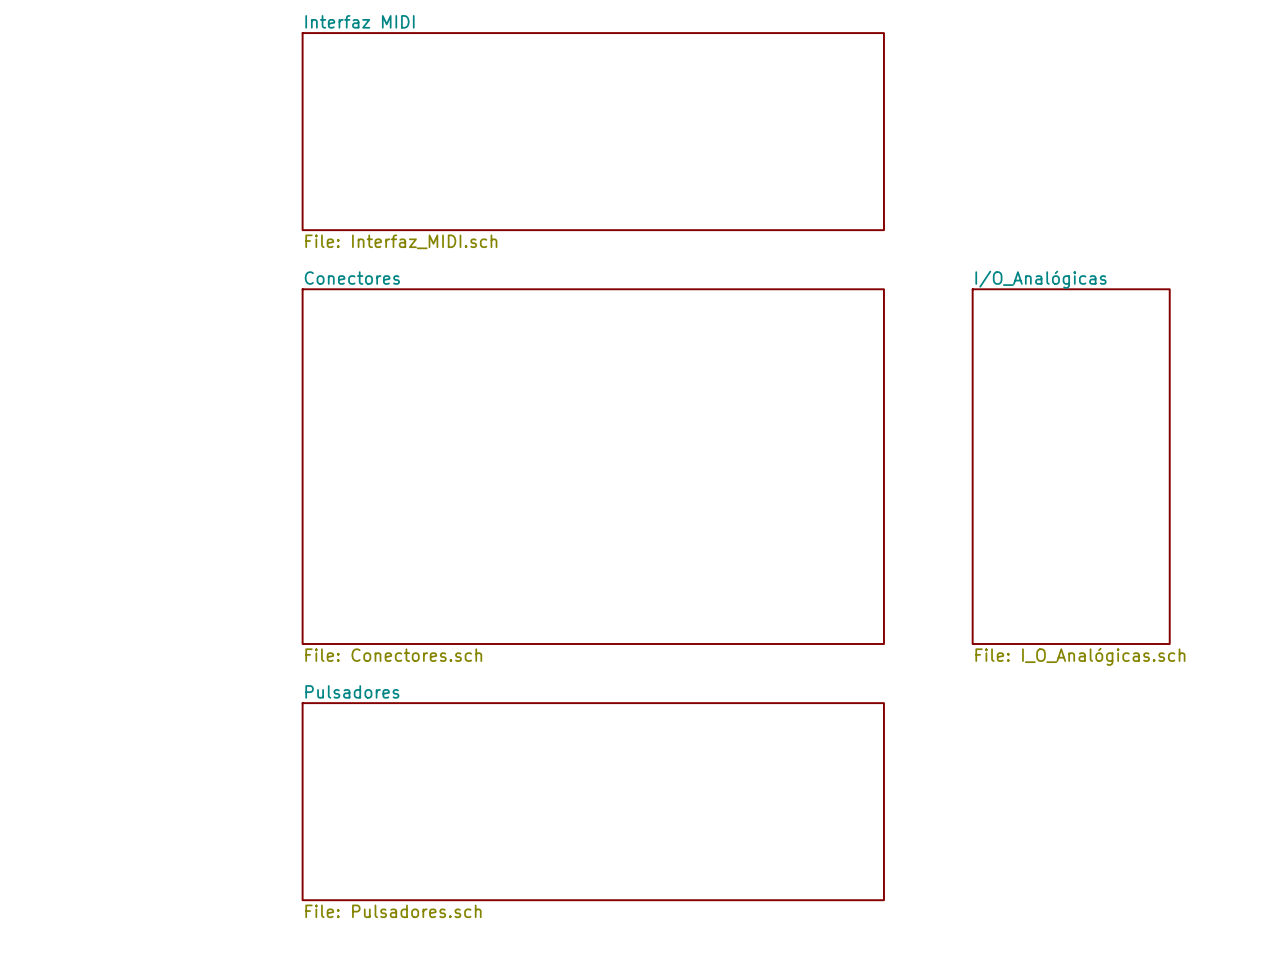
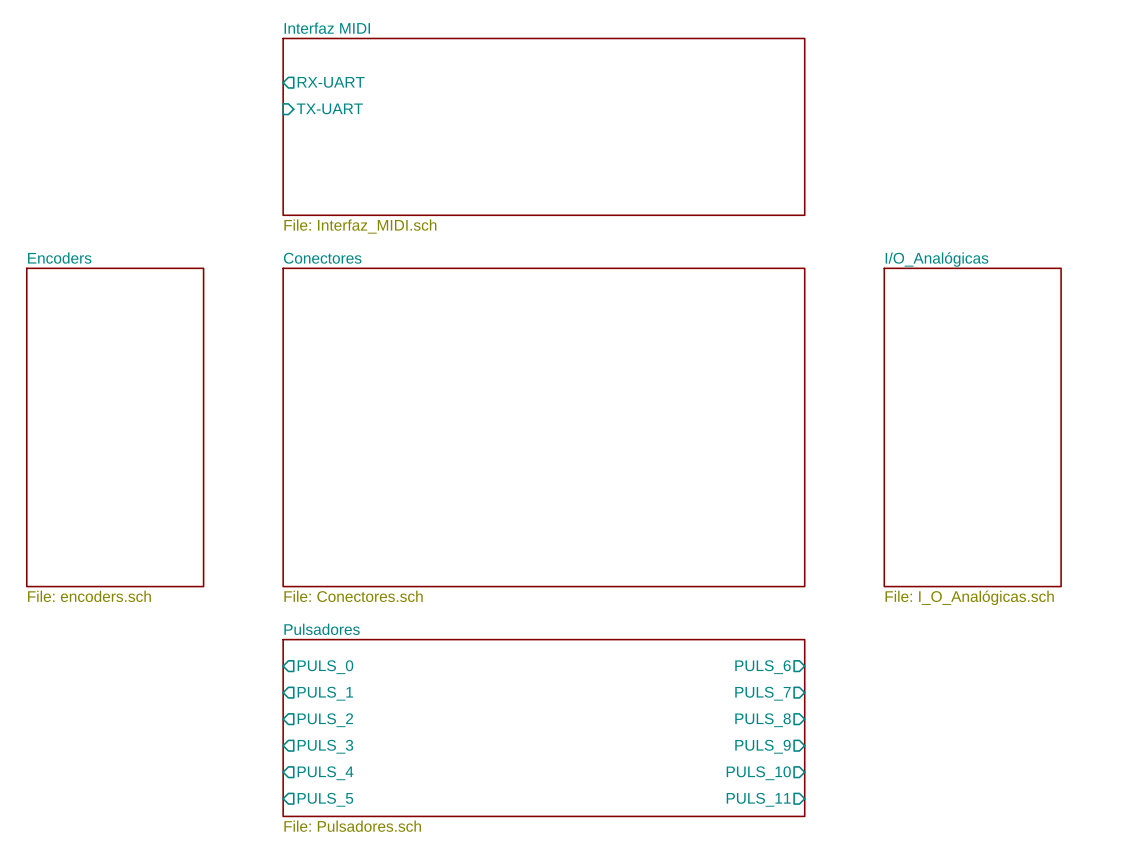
sheet pin: none -> RX-UART (331, 82)
sheet pin: none -> TX-UART (329, 108)
sheet Encoders: none -> File: encoders.sch (115, 427)
sheet pin: none -> PULS_0 (325, 667)
sheet pin: none -> PULS_6 (763, 667)
sheet pin: none -> PULS_1 (325, 693)
sheet pin: none -> PULS_7 (762, 693)
sheet pin: none -> PULS_2 (325, 720)
sheet pin: none -> PULS_8 (763, 720)
sheet pin: none -> PULS_3 (325, 746)
sheet pin: none -> PULS_9 (763, 746)
sheet pin: none -> PULS_4 (325, 773)
sheet pin: none -> PULS_10 (758, 773)
sheet pin: none -> PULS_5 (325, 799)
sheet pin: none -> PULS_11 (758, 799)

